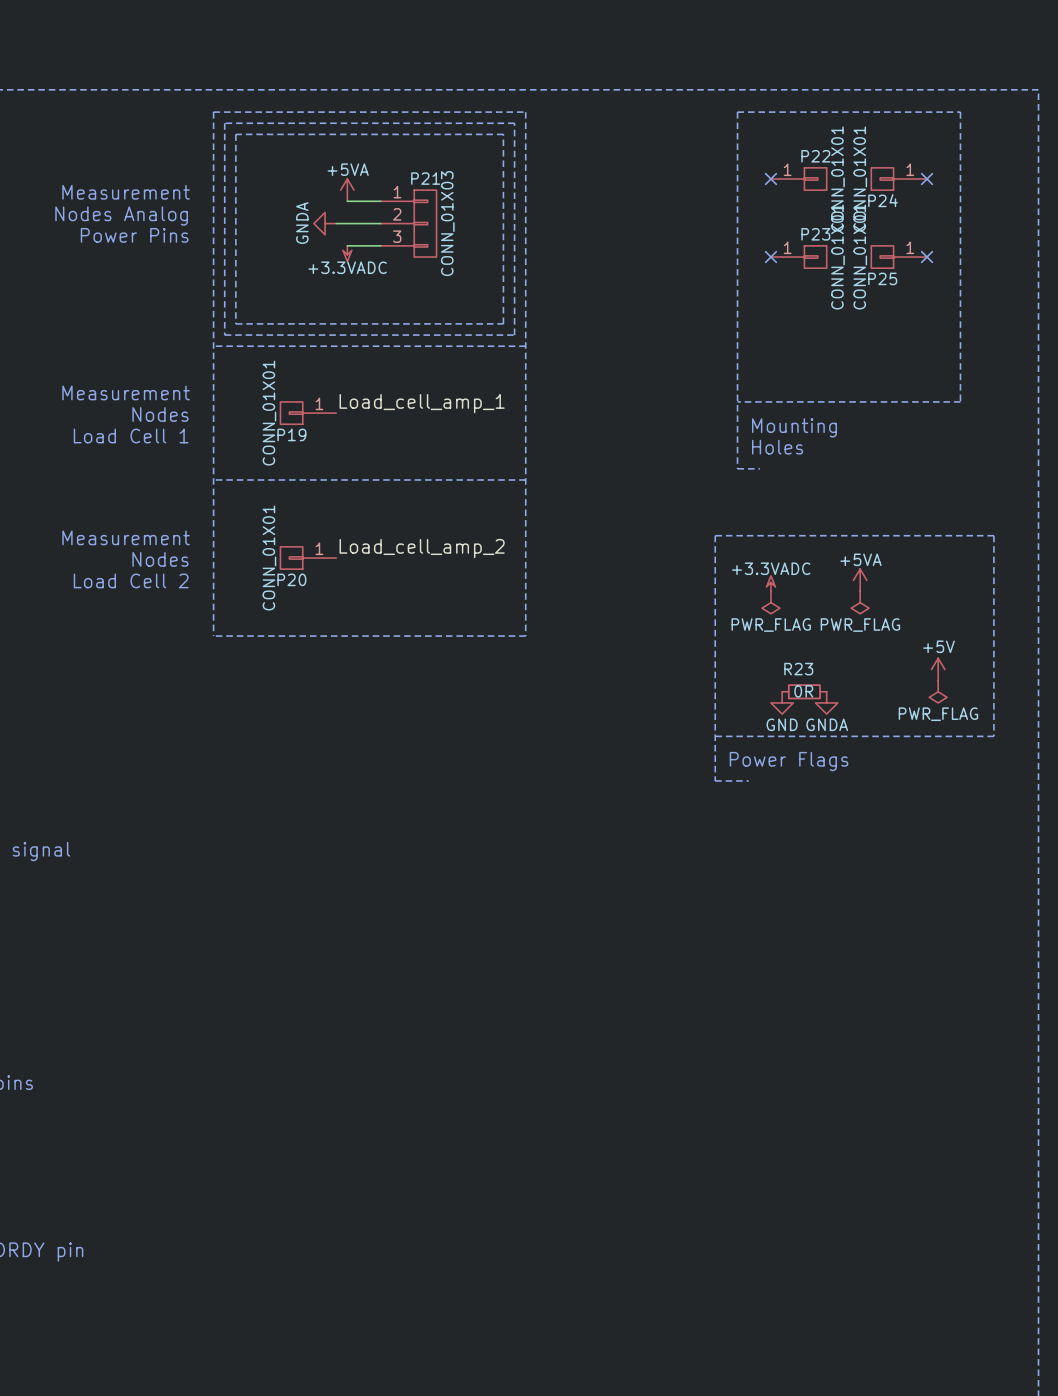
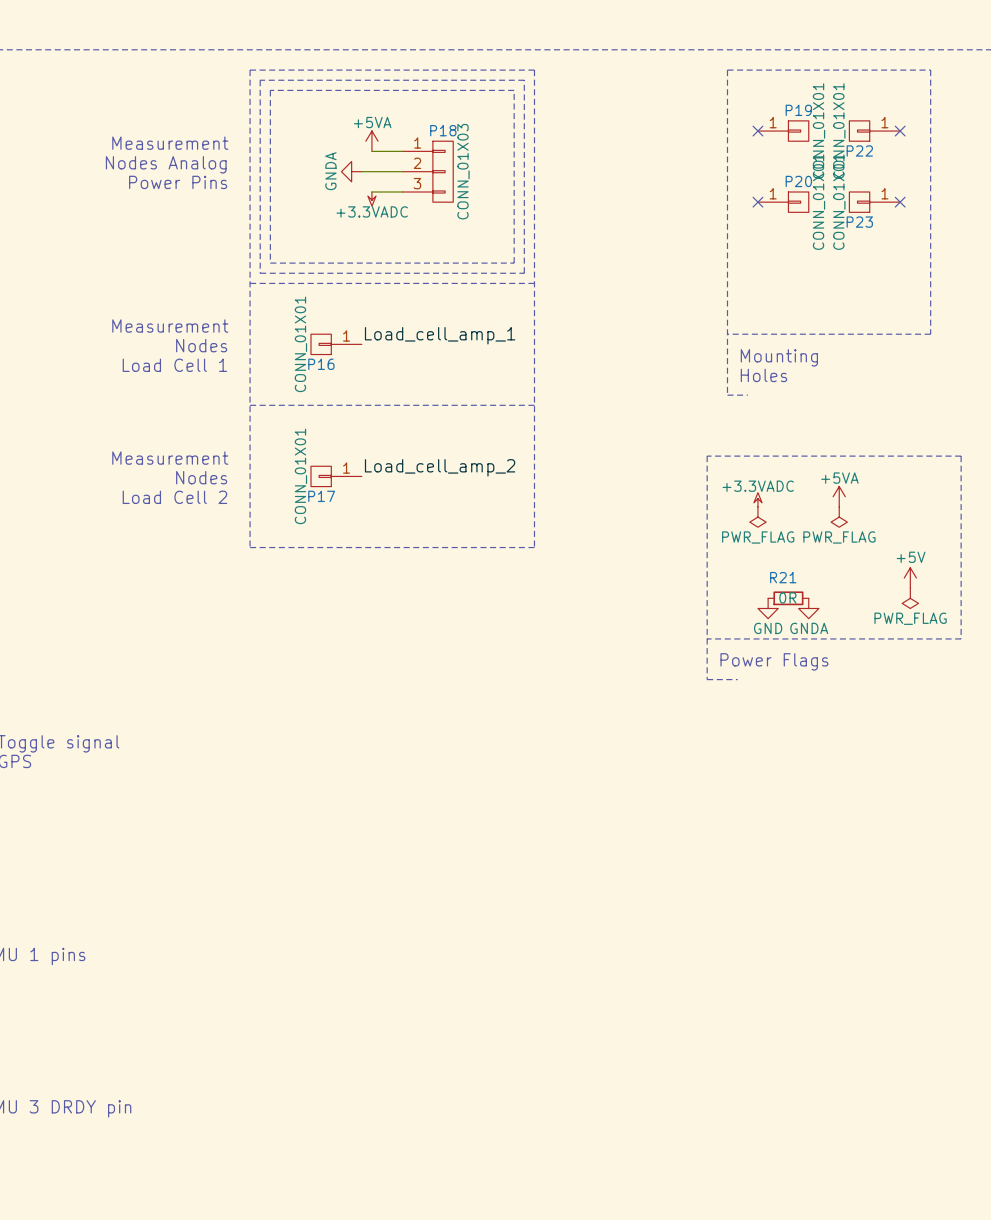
P22 name: P22 (815, 156) -> P19 (798, 110)
P21 name: P21 (425, 178) -> P18 (443, 130)
P24 name: P24 (882, 200) -> P22 (859, 150)
P23 name: P23 (815, 234) -> P20 (798, 181)
P25 name: P25 (882, 278) -> P23 (859, 222)
P19 name: P19 (291, 434) -> P16 (321, 364)
P20 name: P20 (291, 579) -> P17 (321, 496)
R23 name: R23 (798, 669) -> R21 (783, 577)

